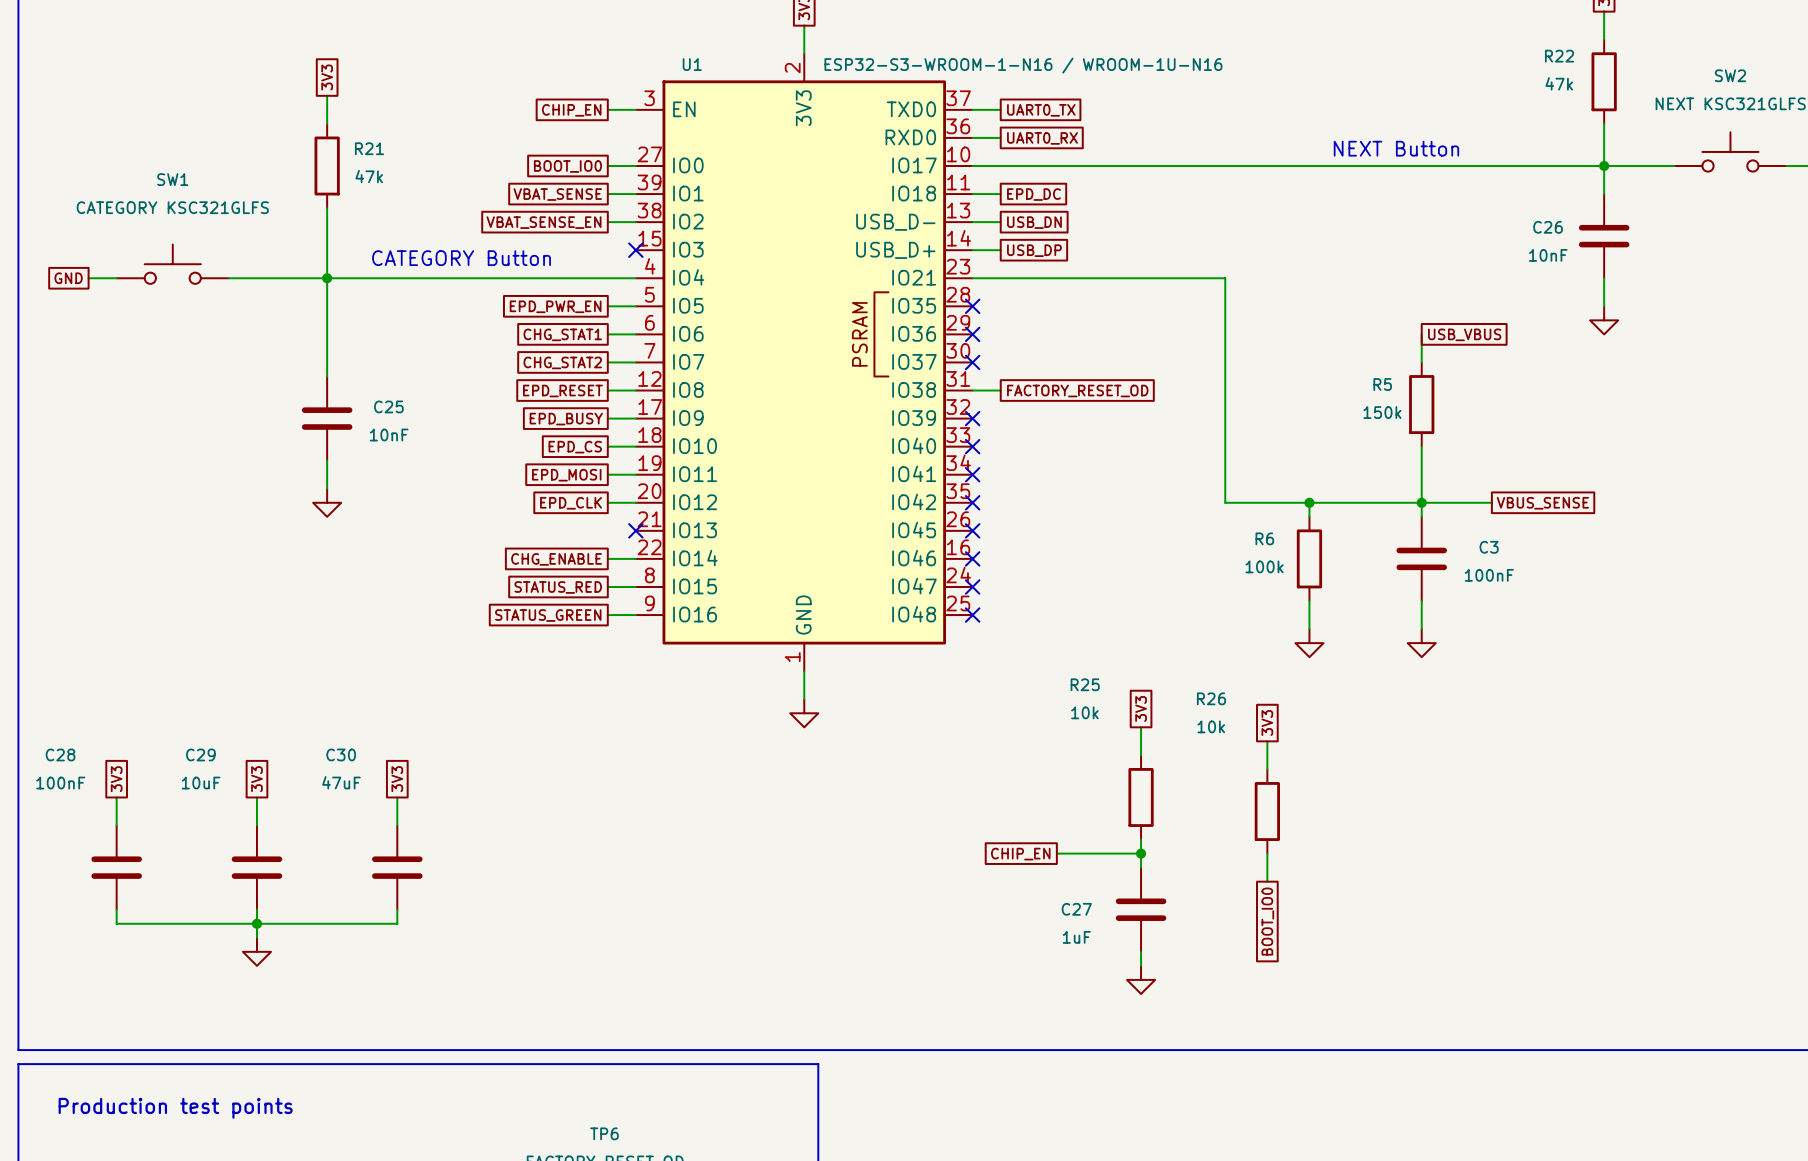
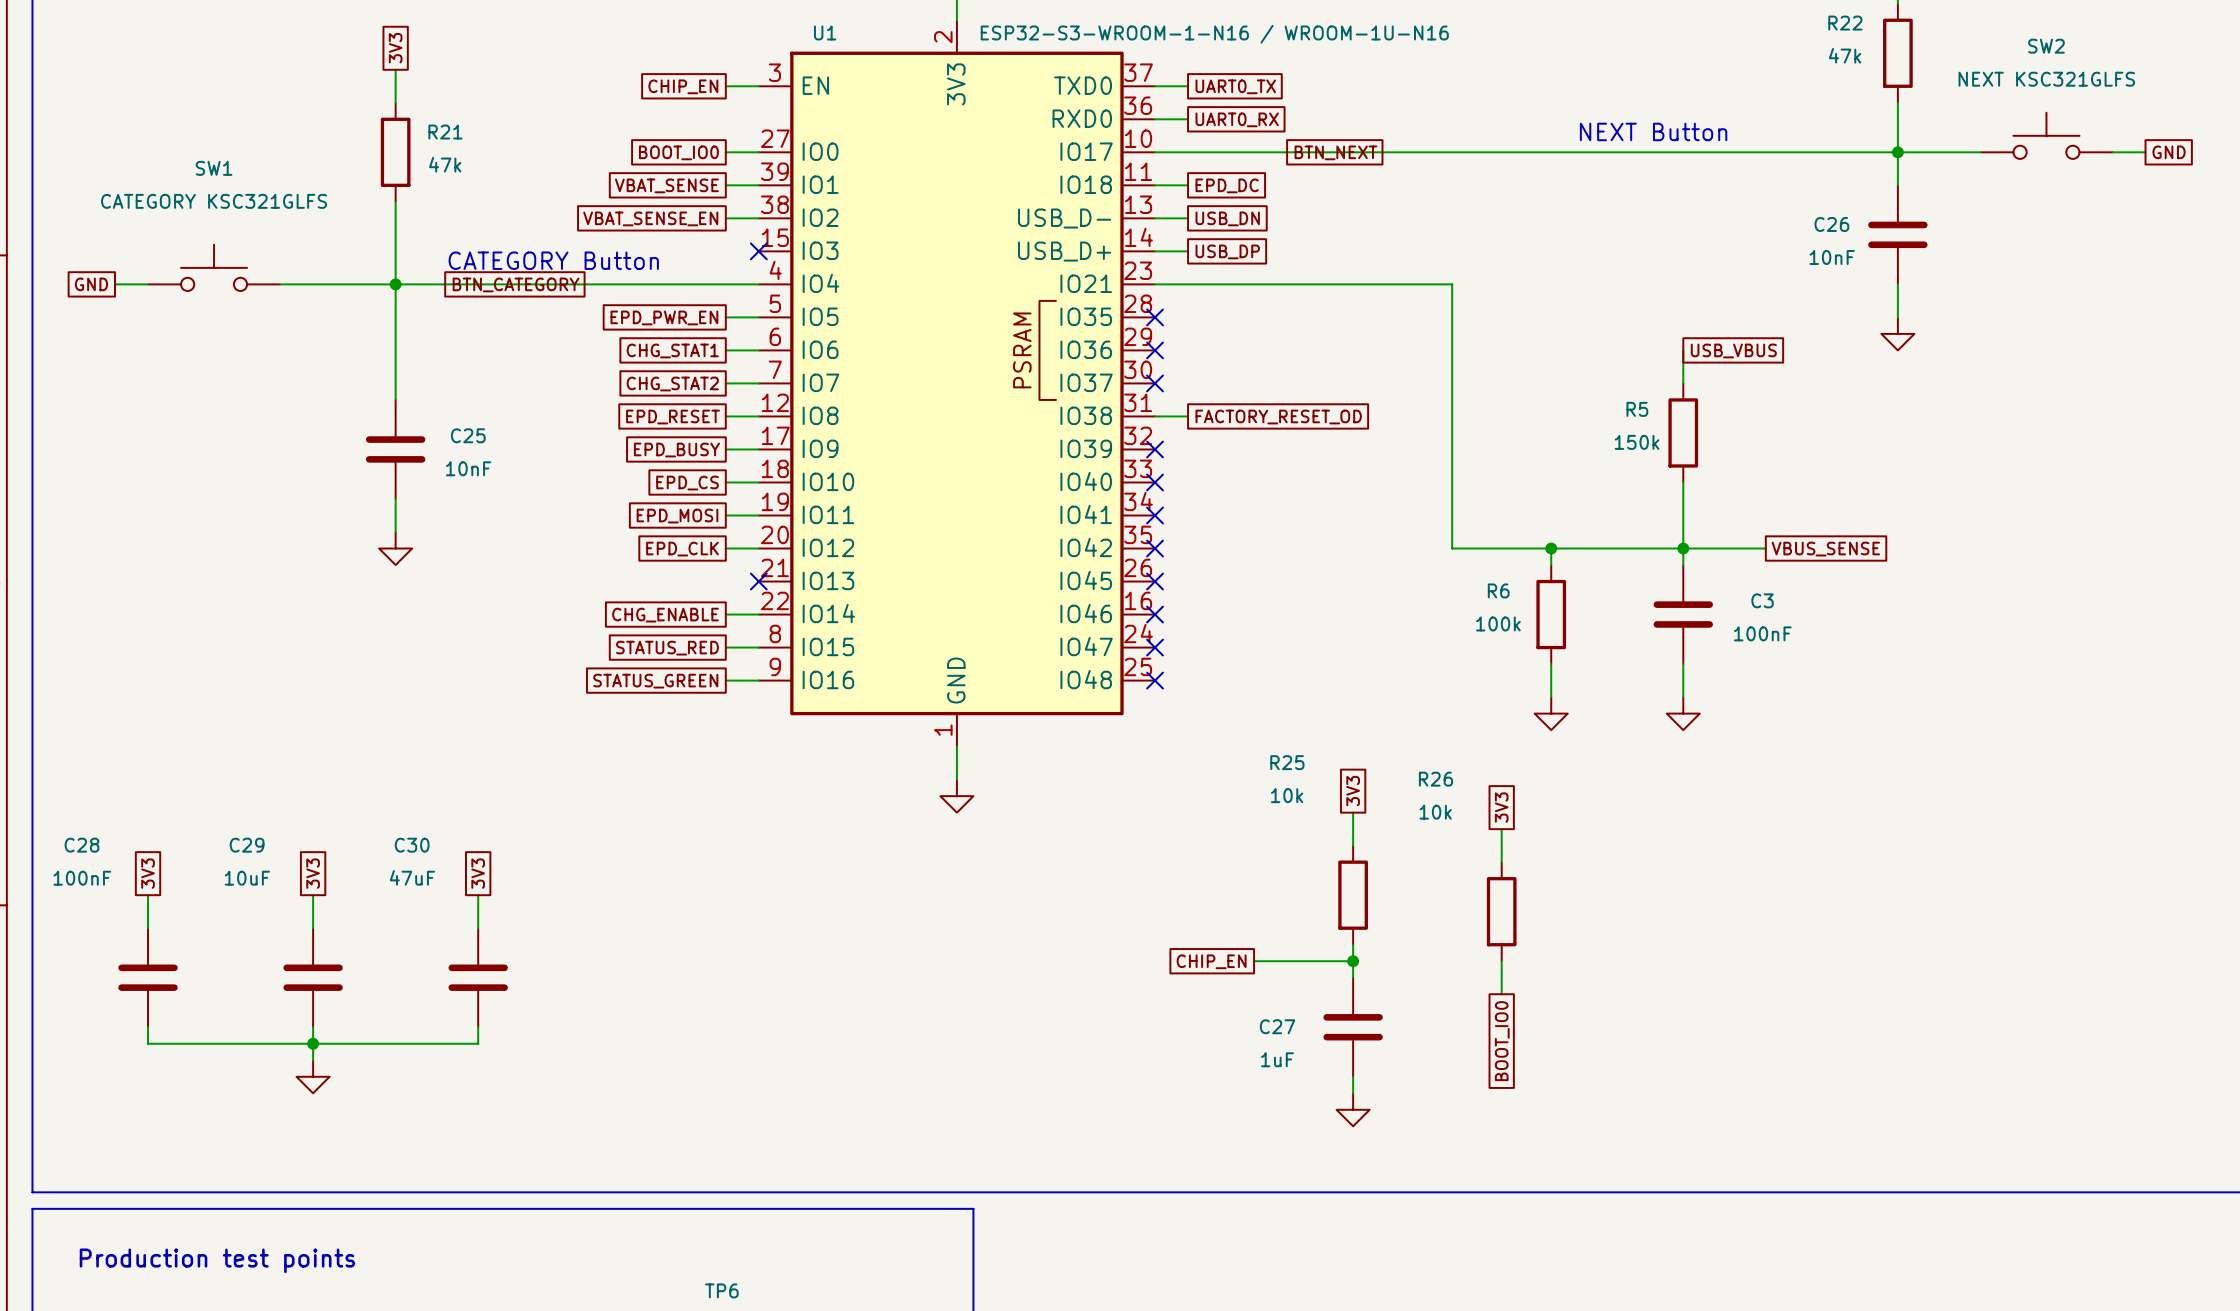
global label: none -> BTN_NEXT (1335, 152)
global label: none -> BTN_CATEGORY (516, 284)

